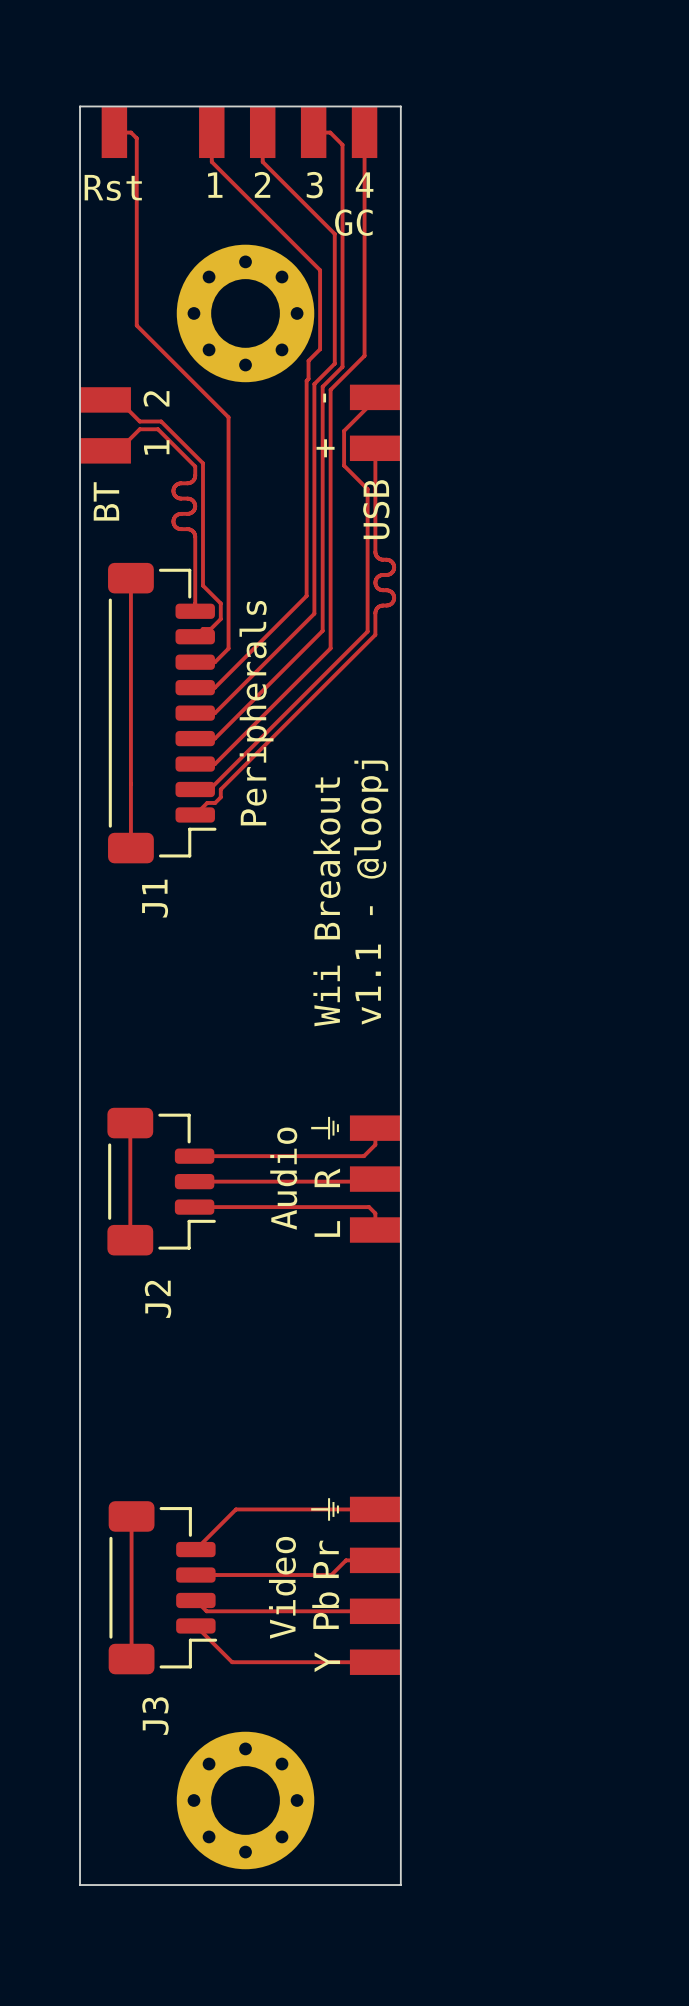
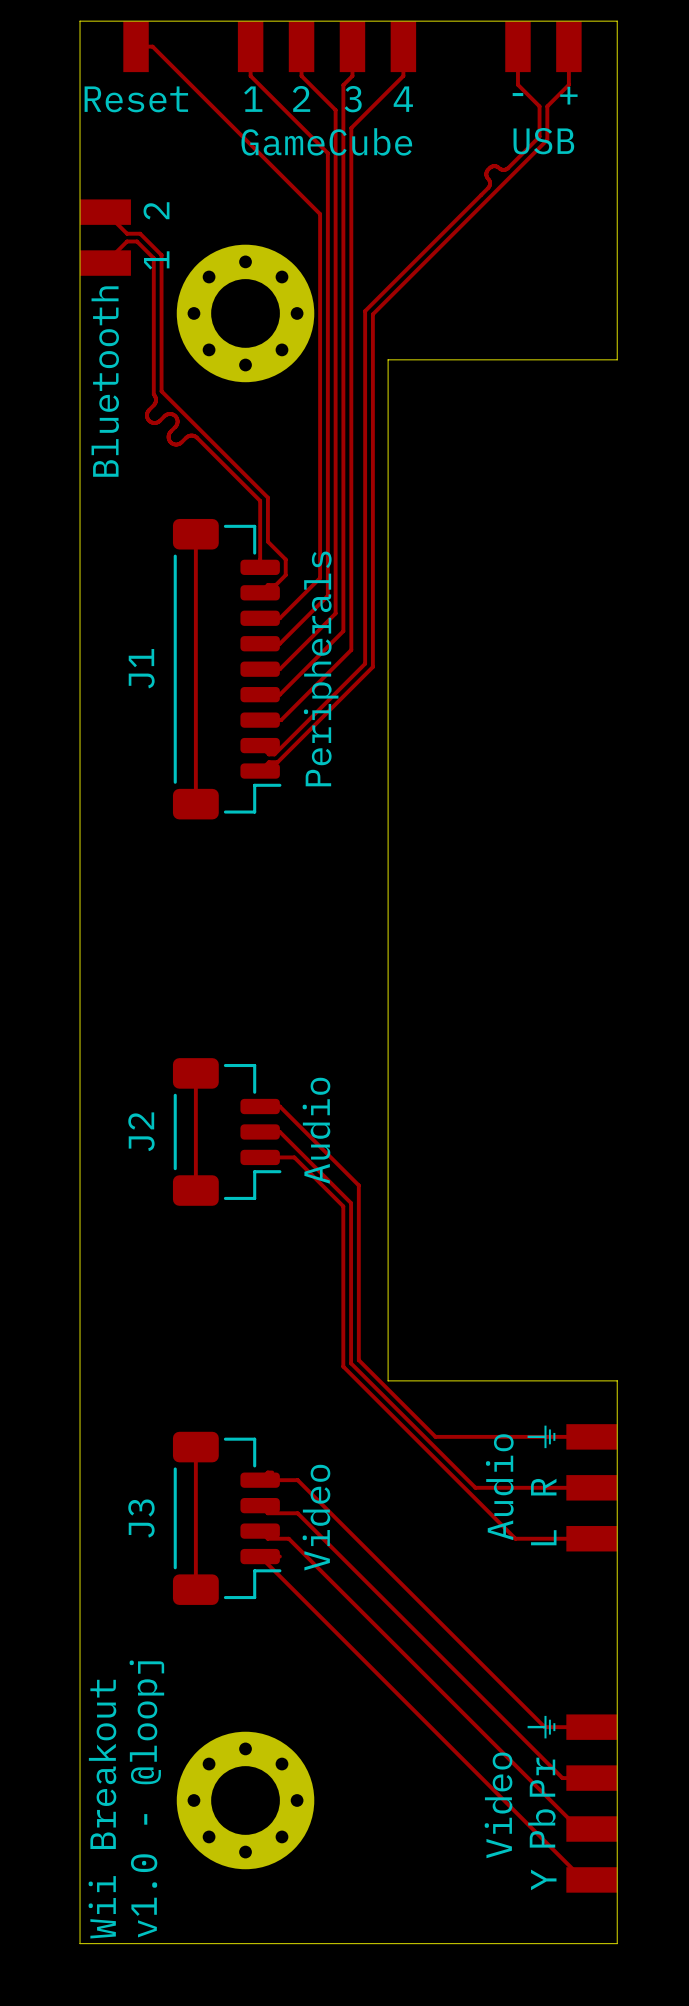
part: none -> Reset (136, 46)
track: none -> (250, 46) (250, 75) (327, 153) (327, 595) (279, 643) (260, 643)
track: none -> (301, 46) (301, 75) (335, 110) (335, 613) (279, 669) (260, 669)
part: none -> GameCube (327, 46)
track: none -> (352, 46) (352, 75) (343, 85) (343, 631) (279, 694) (260, 694)
track: none -> (403, 46) (403, 75) (351, 128) (351, 649) (281, 720) (260, 720)
track: none -> (517, 46) (517, 84) (539, 106) (539, 136) (507, 168) (502, 169) (493, 166) (488, 169) (486, 173) (490, 182) (488, 188) (365, 311) (365, 663) (274, 754) (269, 754) (260, 745)
track: none -> (568, 46) (568, 84) (547, 106) (547, 139) (372, 314) (372, 666) (277, 762) (269, 762) (260, 771)
text: none -> 2 (301, 98)
text: none -> 1 (253, 99)
board edge: (80, 106) (400, 106) (400, 1885) (80, 1885) -> (80, 106) (80, 21) (617, 21) (617, 359) (388, 359) (388, 1380) (617, 1380) (617, 1943) (80, 1943) (80, 1885)
track: (114, 132) (131, 132) (136, 138) (136, 325) (228, 417) (228, 648) (214, 662) (195, 662) -> none
part: Rst (114, 132) -> none
track: (211, 132) (211, 161) (320, 270) -> (136, 46) (152, 46) (320, 214) (320, 270)
track: (262, 132) (262, 161) (334, 233) (334, 363) (314, 384) (314, 613) (214, 713) (195, 713) -> none
part: GC (288, 132) -> none
track: (313, 132) (330, 132) (342, 144) (342, 366) (322, 386) (322, 630) (214, 738) (195, 738) -> none
track: (364, 132) (364, 355) (330, 389) (330, 648) (214, 764) (195, 764) -> none
text: 2 (262, 184) -> none
text: 1 (215, 185) -> none
text position: 3 (314, 185) -> 3 (353, 99)
text position: 4 (364, 185) -> 4 (403, 99)
text: none -> 2 (156, 210)
track: none -> (105, 212) (127, 233) (140, 233) (161, 255) (161, 391) (267, 497) (267, 541) (285, 559) (285, 575) (275, 585) (267, 585) (260, 592)
part: none -> Bluetooth (105, 237)
text: none -> 1 (156, 260)
track: none -> (105, 263) (127, 241) (136, 241) (153, 258) (153, 394) (155, 400) (148, 411) (147, 417) (150, 421) (155, 422) (167, 414) (174, 415) (177, 422) (168, 434) (170, 442) (178, 444) (189, 435) (195, 436) (260, 500) (260, 567)
track: (320, 349) (308, 360) (308, 378) (306, 380) (306, 595) (214, 687) (195, 687) -> (320, 349) (320, 578) (279, 618) (260, 618)
track: (375, 397) (344, 430) (344, 465) (367, 489) (367, 631) (209, 789) (195, 789) -> none
text: 2 (156, 398) -> none
text rotation: 0° (324, 398) -> 90° counterclockwise (517, 94)
text position: - (324, 398) -> - (517, 94)
track: (105, 399) (118, 399) (139, 421) (161, 421) (202, 463) (202, 585) (220, 603) (220, 619) (210, 628) (202, 628) (195, 636) -> none
part rotation: 0° (375, 422) -> 90° clockwise (543, 46)
part position: (375, 422) -> (543, 46)
part: BT (105, 425) -> none
text: 1 (156, 447) -> none
text rotation: 0° (325, 448) -> 90° counterclockwise (568, 95)
text position: + (325, 448) -> + (568, 95)
track: (375, 448) (375, 553) (379, 558) (391, 561) (394, 567) (389, 574) (378, 576) (375, 584) (379, 589) (391, 591) (394, 596) (393, 601) (389, 604) (379, 606) (376, 609) (375, 634) (220, 789) (220, 797) (215, 802) (207, 802) (195, 814) -> none
track: (105, 450) (118, 450) (139, 429) (157, 429) (195, 466) (193, 480) (189, 483) (177, 484) (173, 490) (177, 497) (190, 499) (195, 504) (192, 512) (177, 514) (173, 521) (177, 528) (190, 529) (195, 535) (195, 611) -> none
track: (130, 578) (130, 848) -> (195, 534) (195, 804)
J1 position: (162, 713) -> (227, 669)
text: v1.1 - @loopj (371, 892) -> none
J1 name position: J1 (155, 898) -> J1 (141, 668)
text: Wii Breakout (326, 901) -> none
track: none -> (260, 1106) (279, 1106) (358, 1185) (358, 1360) (435, 1436) (591, 1436)
track: (130, 1123) (130, 1240) -> (195, 1073) (195, 1190)
text: ⏚ (325, 1128) -> none
track: (375, 1128) (375, 1144) (363, 1156) (194, 1156) -> none
J2 value: none -> Audio (316, 1130)
track: none -> (260, 1131) (279, 1131) (351, 1203) (351, 1363) (475, 1487) (591, 1487)
track: none -> (260, 1157) (294, 1157) (343, 1206) (343, 1366) (515, 1538) (591, 1538)
text position: R (327, 1177) -> R (543, 1487)
track: (375, 1179) (372, 1181) (194, 1181) -> none
part position: (375, 1179) -> (591, 1487)
J2 position: (161, 1181) -> (227, 1131)
track: (194, 1207) (369, 1207) (375, 1213) (375, 1230) -> none
text position: L (327, 1228) -> L (543, 1537)
J2 name position: J2 (158, 1299) -> J2 (141, 1131)
text: none -> ⏚ (541, 1436)
track: none -> (272, 1472) (267, 1472) (260, 1480) (297, 1480) (544, 1727) (591, 1727)
track: none -> (260, 1505) (267, 1513) (297, 1513) (562, 1778) (591, 1778)
text: ⏚ (325, 1509) -> none
track: (375, 1509) (235, 1509) (195, 1549) -> none
track: (131, 1516) (131, 1659) -> (195, 1447) (195, 1589)
J3 value: none -> Video (316, 1517)
track: none -> (260, 1531) (267, 1538) (288, 1538) (579, 1829) (591, 1829)
track: none -> (279, 1556) (260, 1556) (583, 1879) (591, 1879)
text position: Pr (326, 1559) -> Pr (542, 1777)
track: (375, 1560) (346, 1560) (331, 1575) (195, 1575) -> none
part position: (375, 1585) -> (591, 1803)
J3 position: (162, 1587) -> (227, 1518)
track: (195, 1600) (206, 1611) (375, 1611) -> none
text position: Pb (325, 1610) -> Pb (541, 1828)
track: (195, 1625) (232, 1662) (375, 1662) -> none
text position: Y (327, 1662) -> Y (543, 1879)
J3 name position: J3 (155, 1716) -> J3 (141, 1518)
text: none -> ⏚ (541, 1727)
text: none -> v1.0 - @loopj (146, 1798)
text: none -> Wii Breakout (102, 1809)

